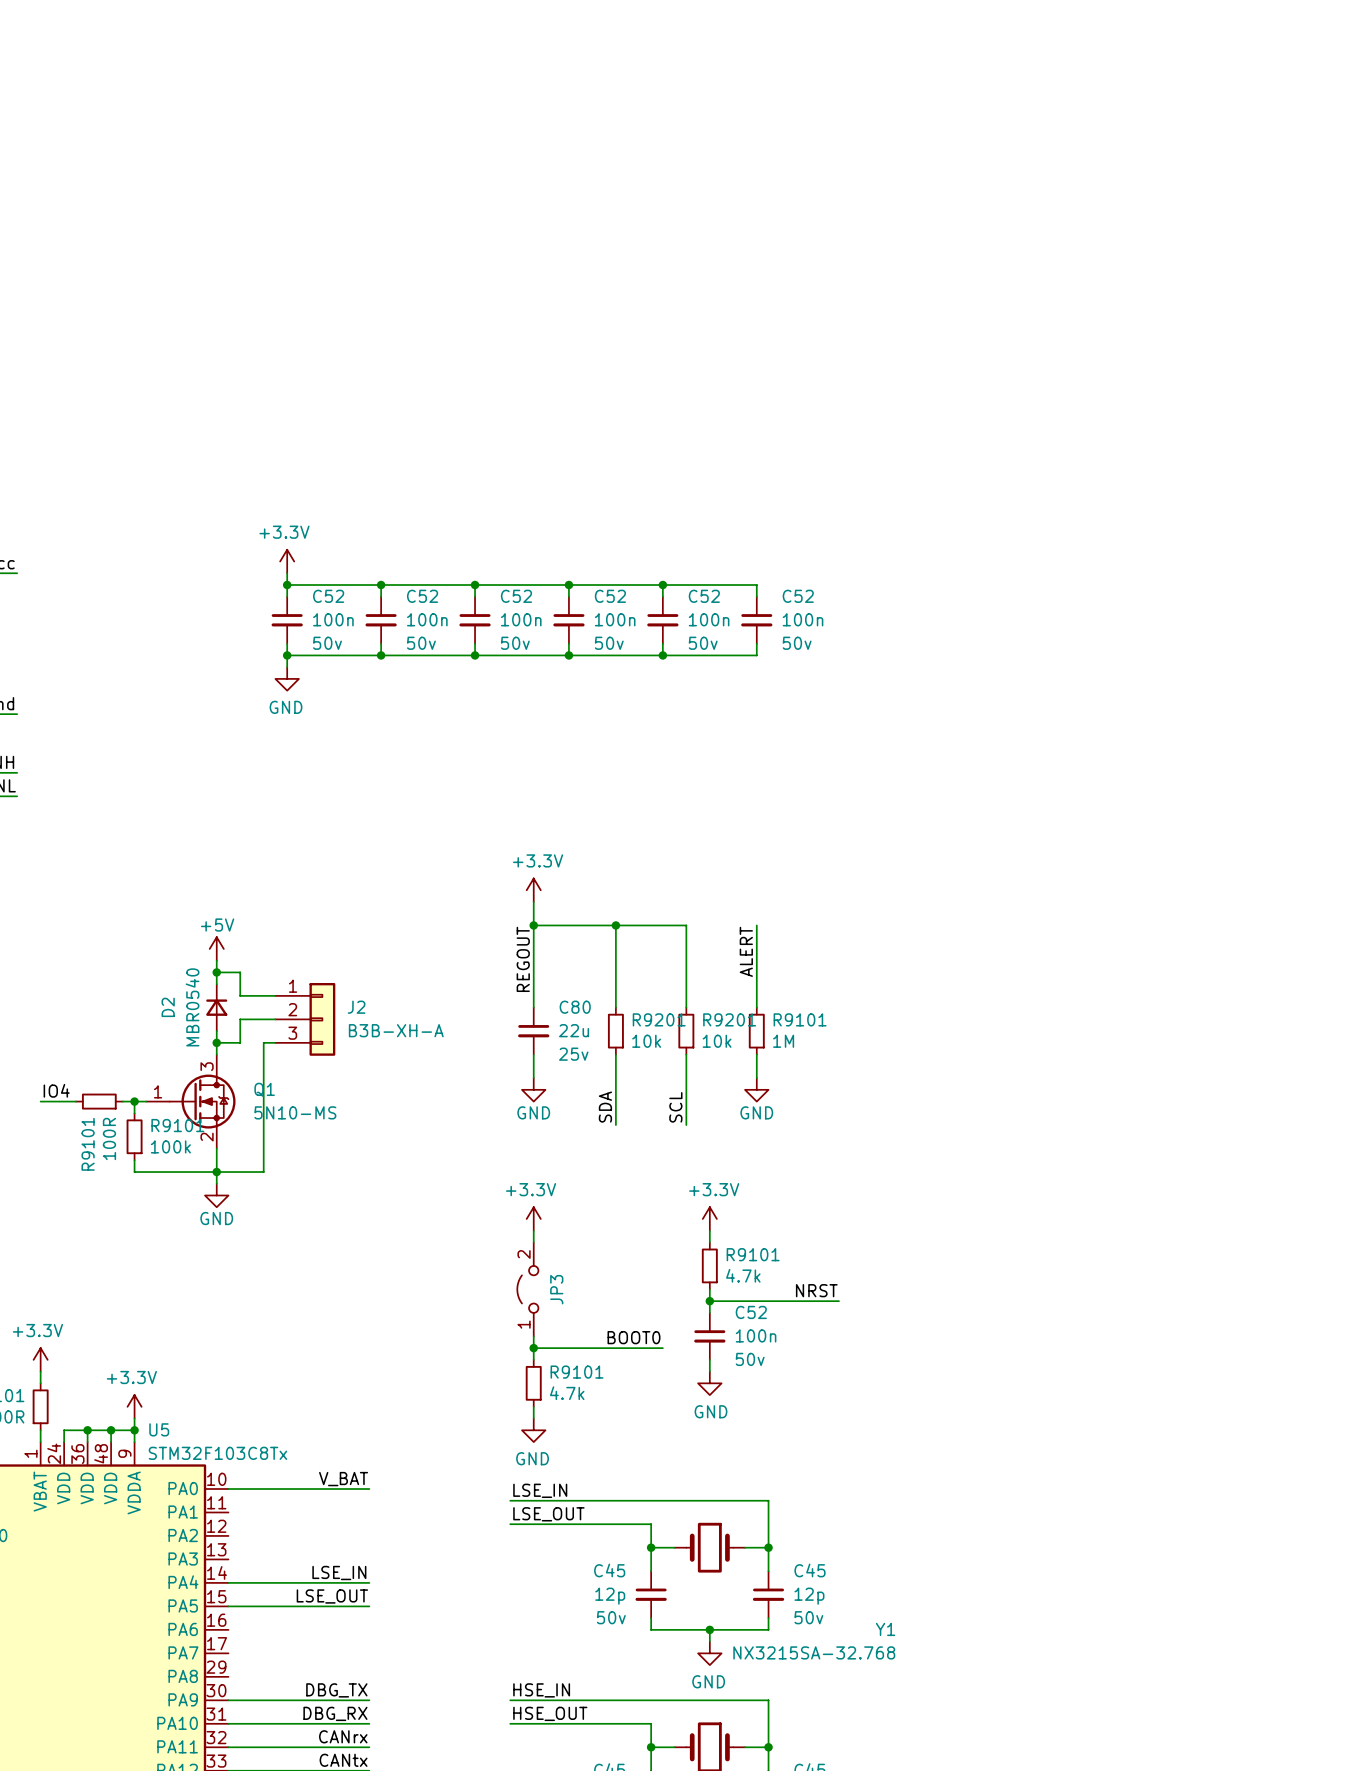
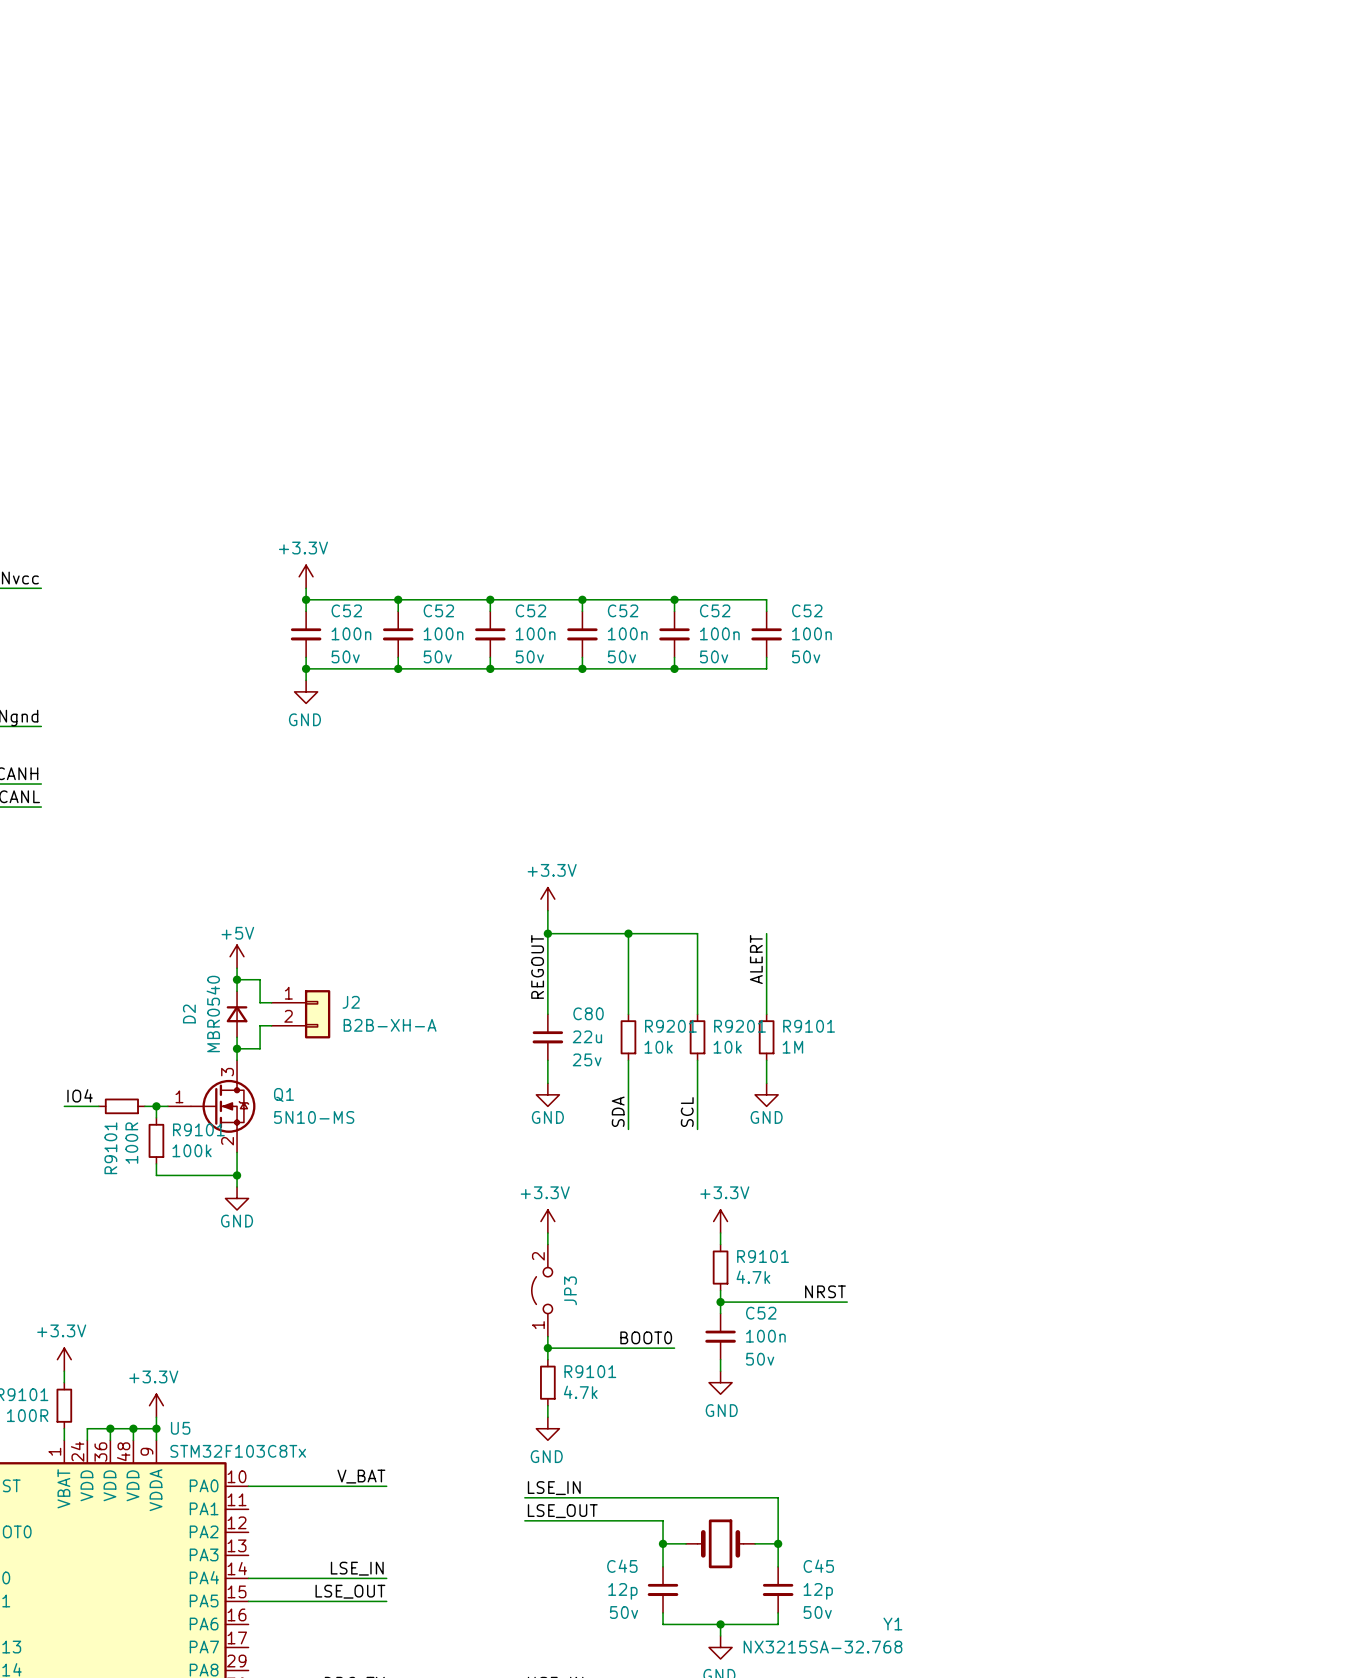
J2 symbol: [275, 982, 336, 1056] -> [271, 990, 331, 1039]
J2 value: B3B-XH-A (396, 1030) -> B2B-XH-A (390, 1025)
wire: (275, 1042) (263, 1042) (263, 1172) (216, 1172) -> none

